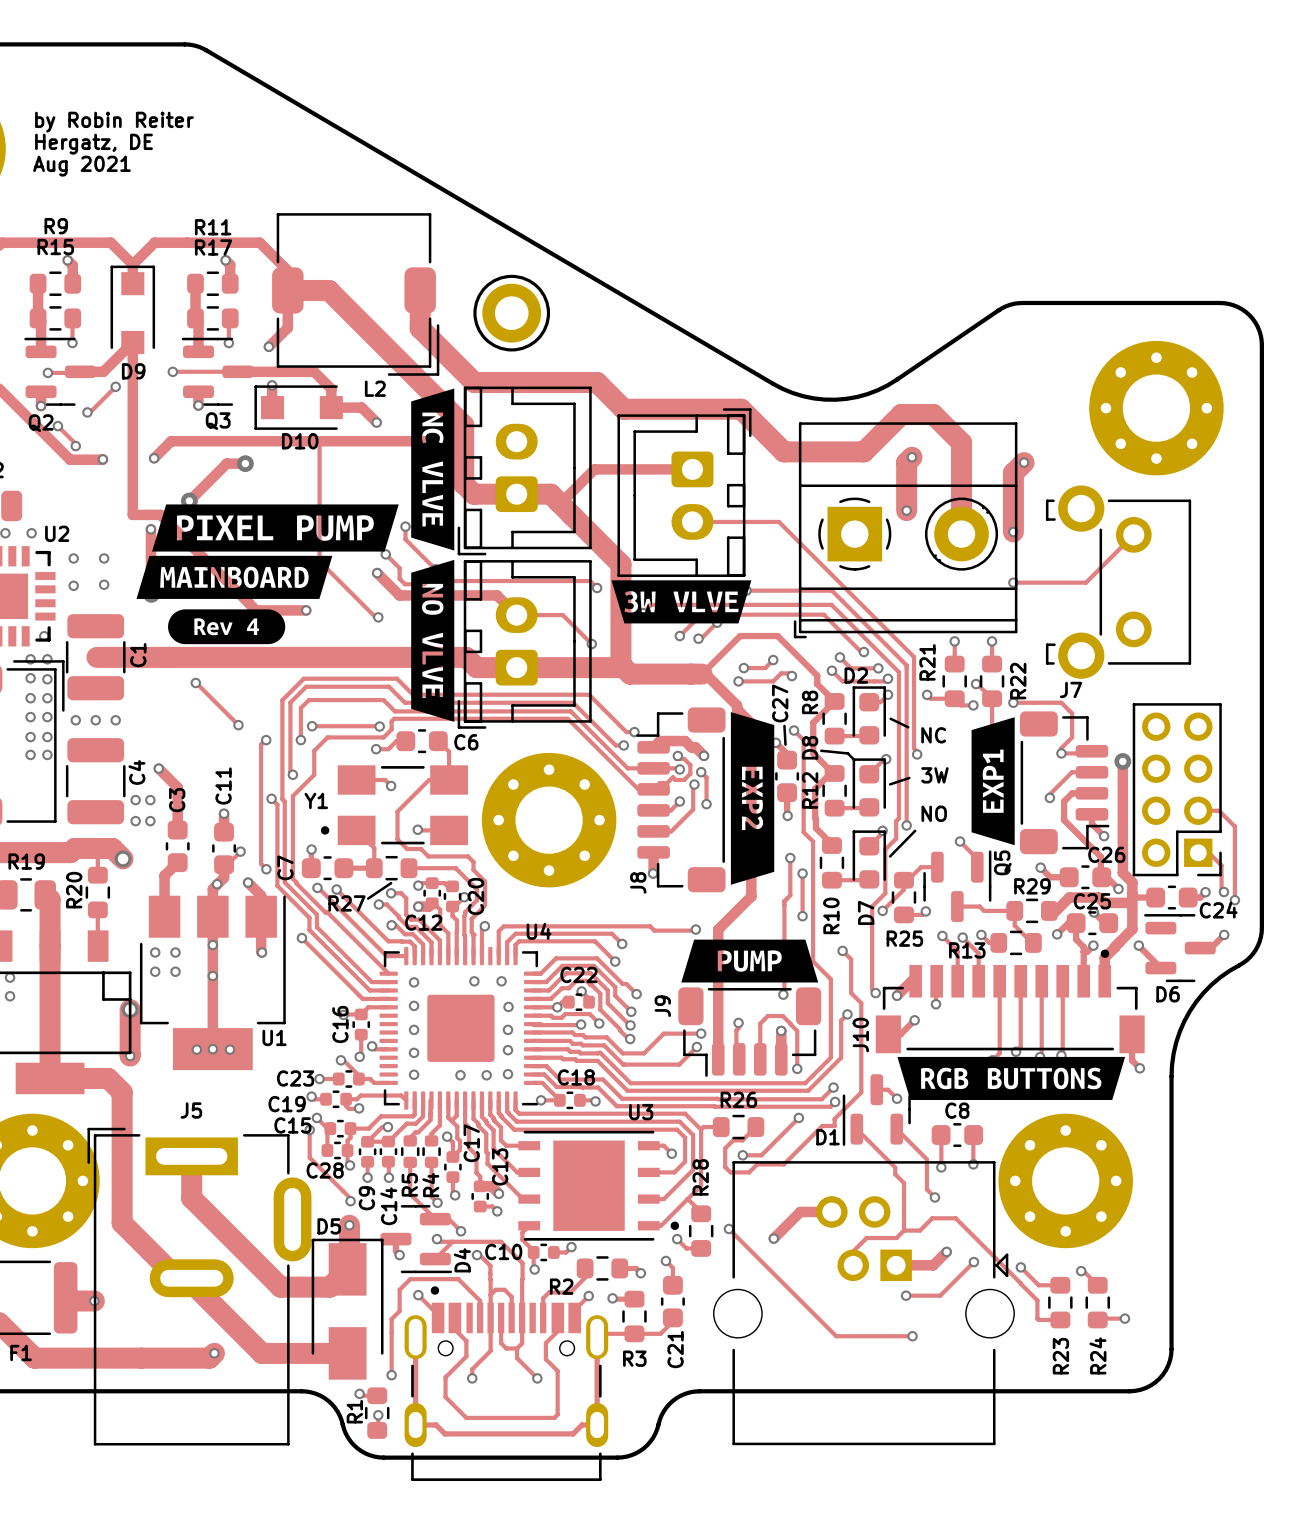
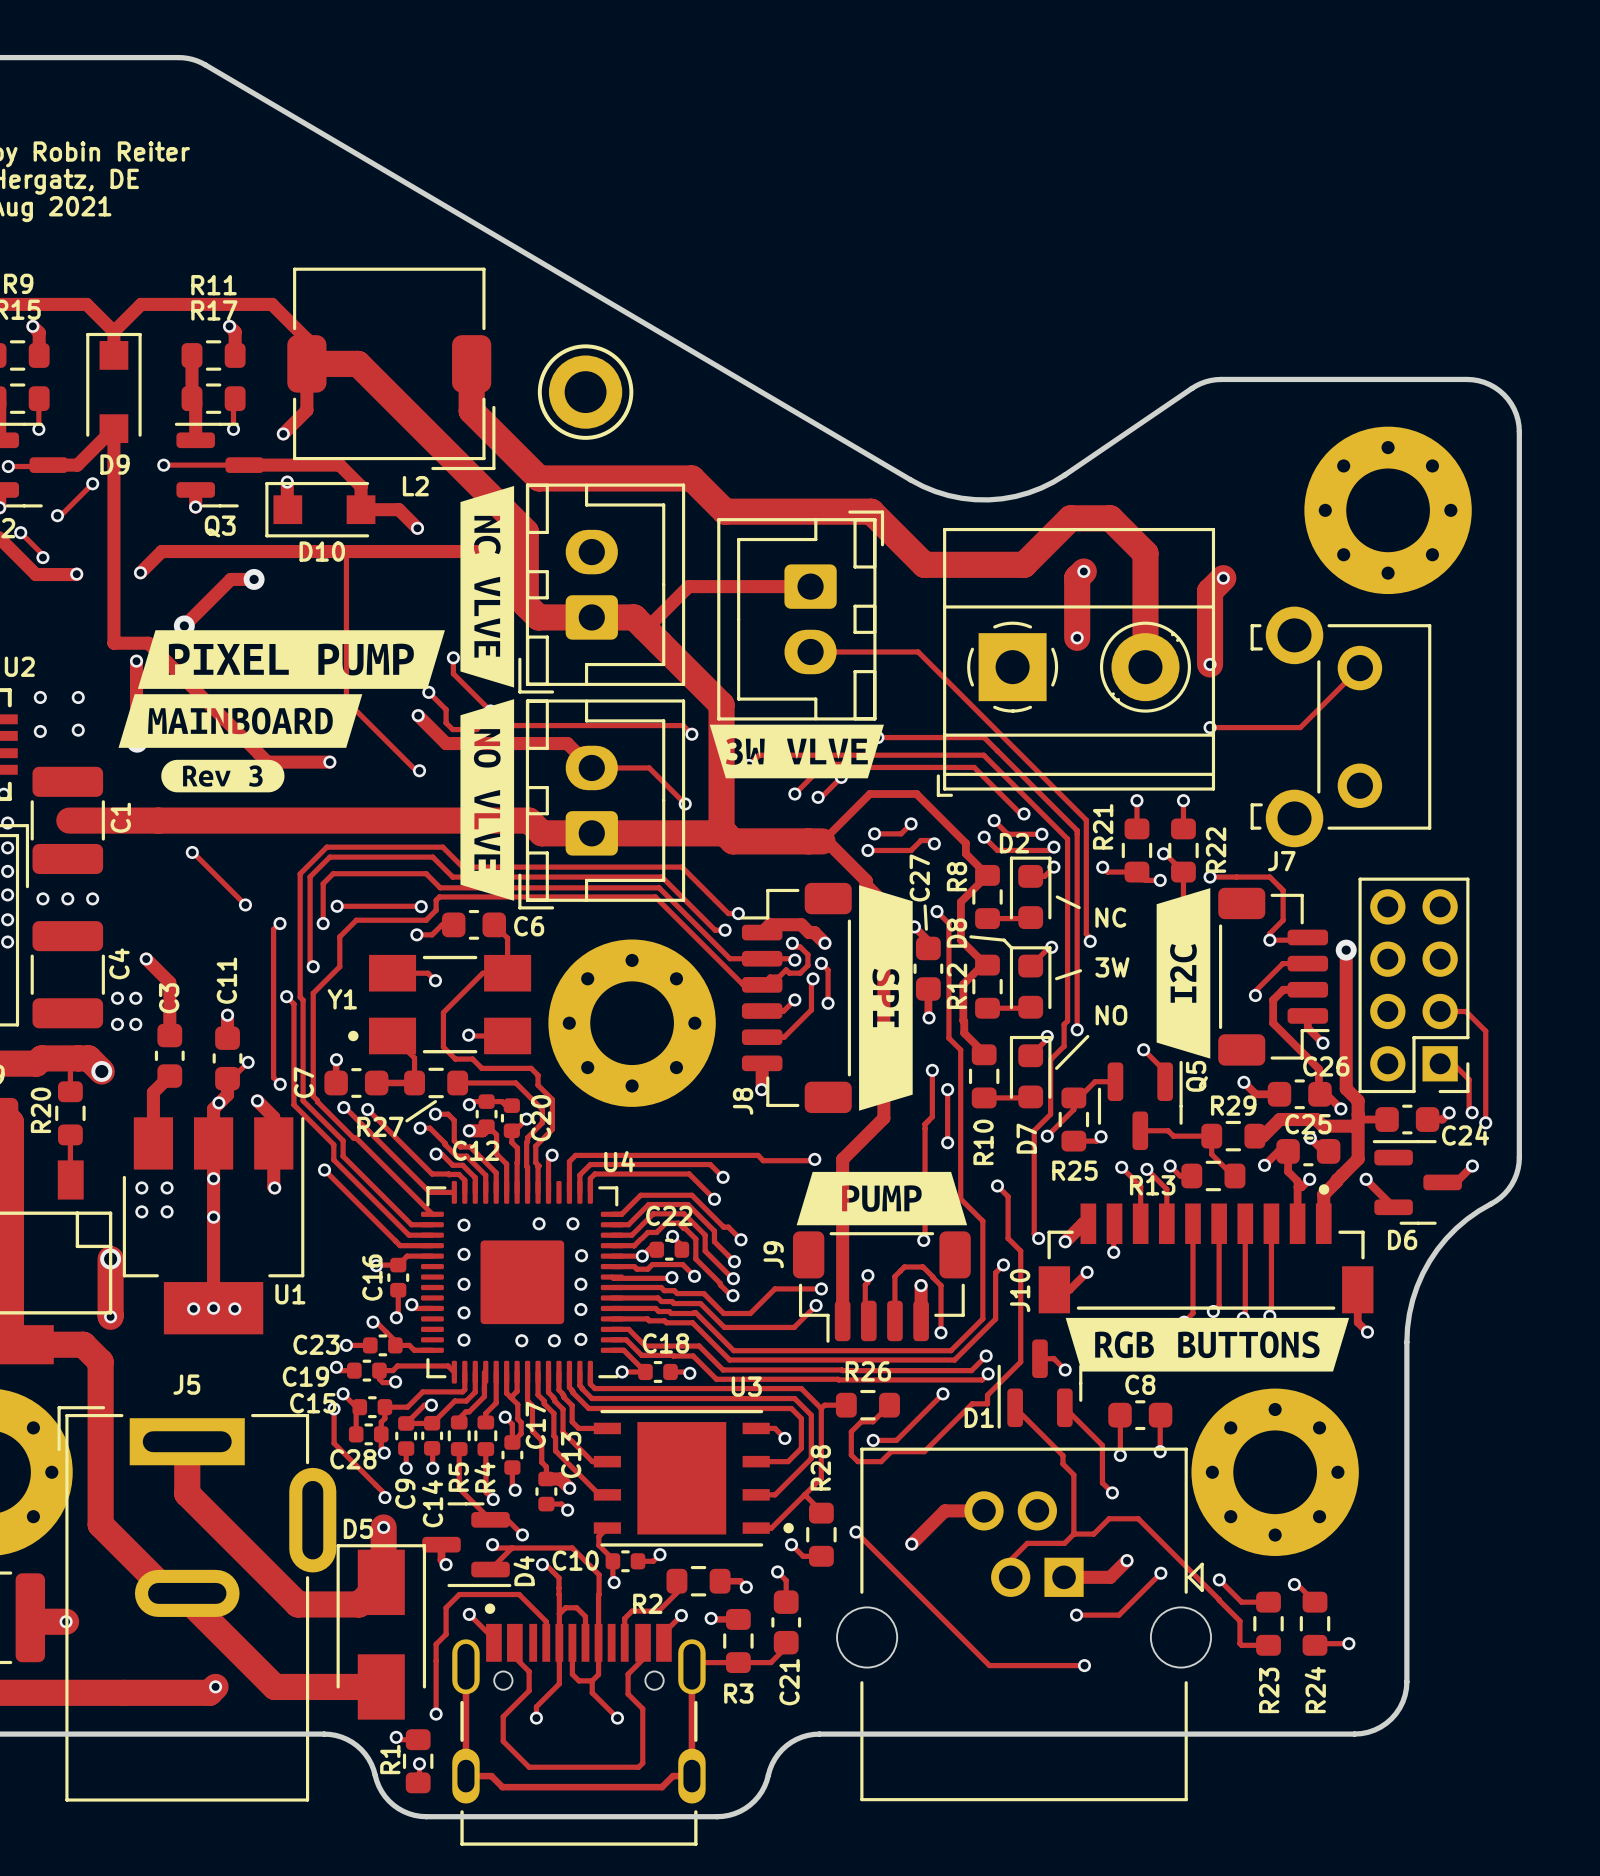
drawing shape: [168, 609, 286, 645] -> [161, 759, 285, 793]
drawing shape: [730, 712, 775, 885] -> [859, 885, 913, 1111]
drawing shape: [971, 717, 1015, 846] -> [1156, 888, 1211, 1059]

